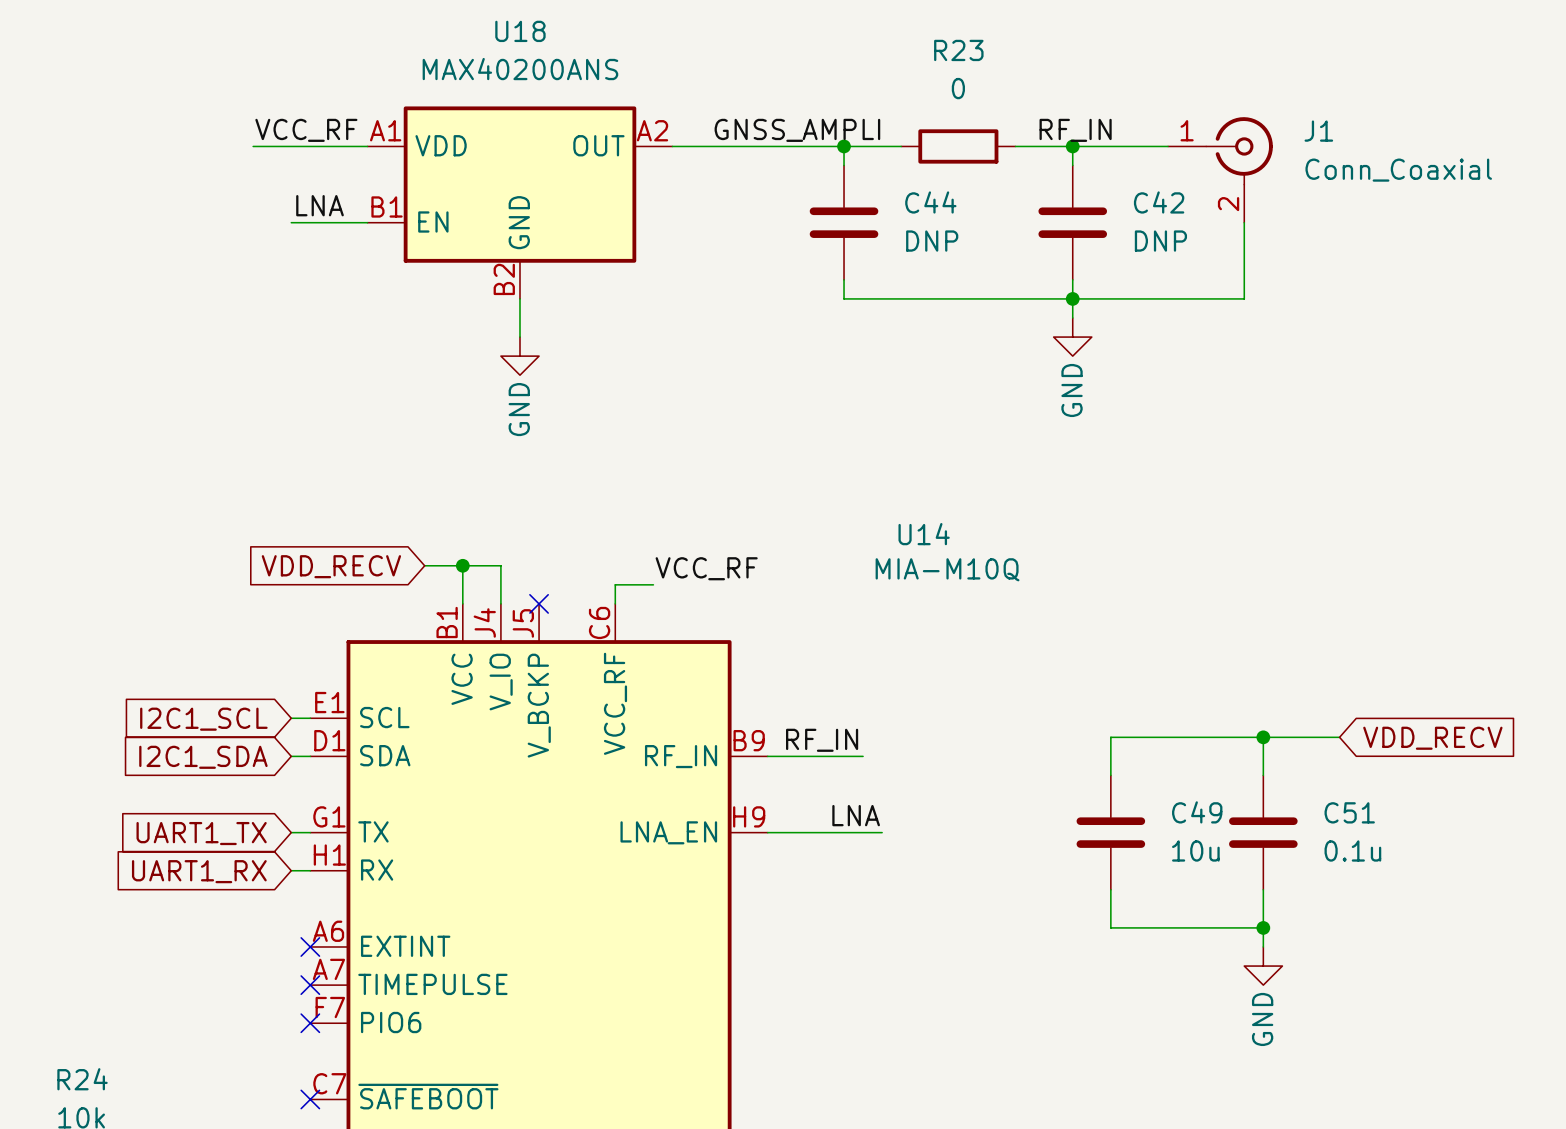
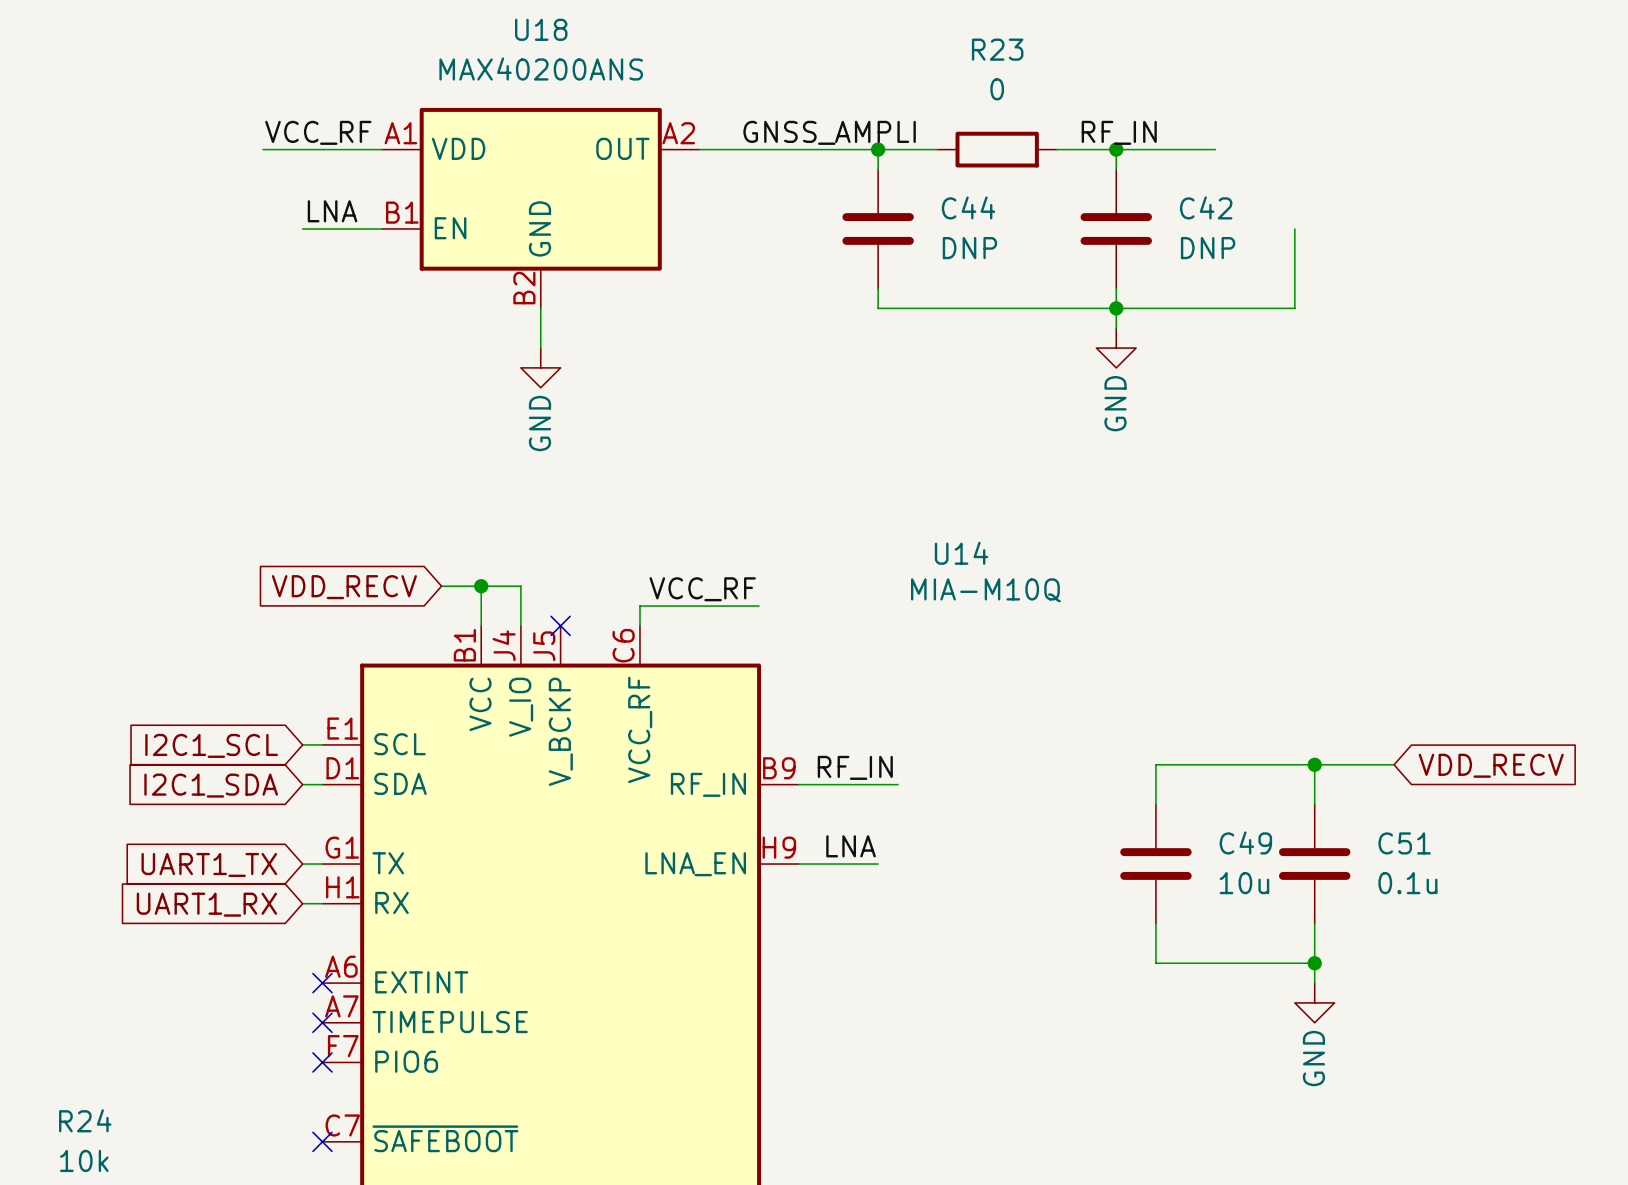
J1: Conn_Coaxial (1220, 169) -> none
label position: VCC_RF (706, 568) -> VCC_RF (702, 589)
wire: none -> (679, 606) (759, 606)
label position: LNA (856, 815) -> LNA (851, 846)
wire: (844, 832) (882, 832) -> none

